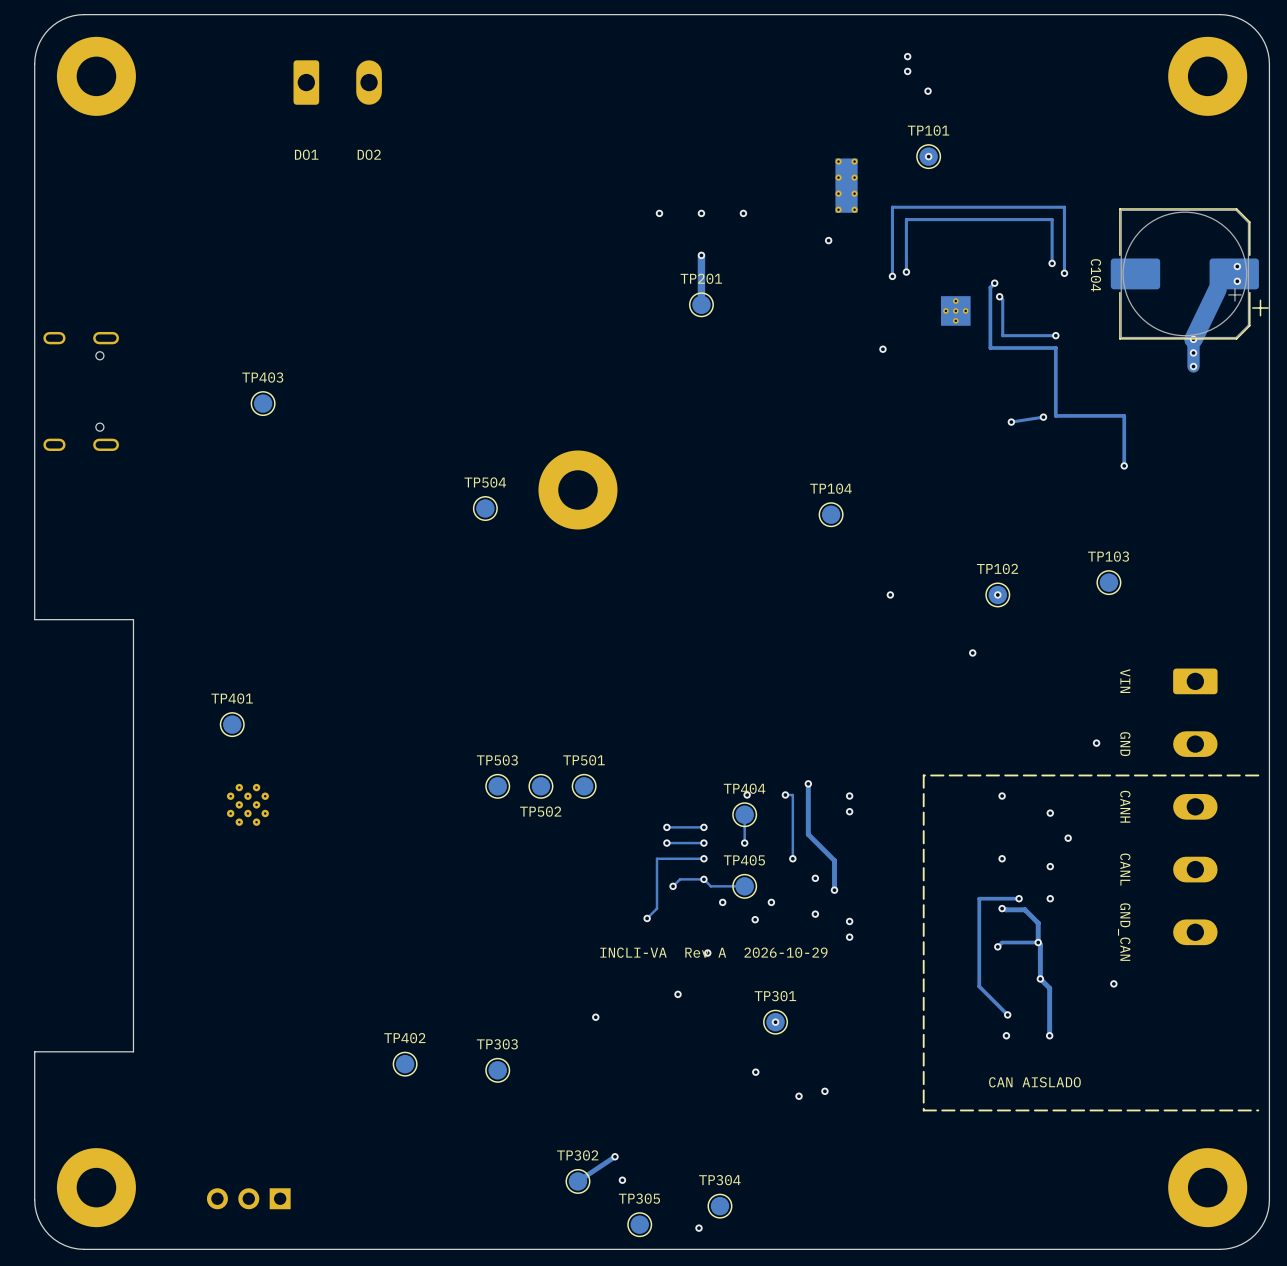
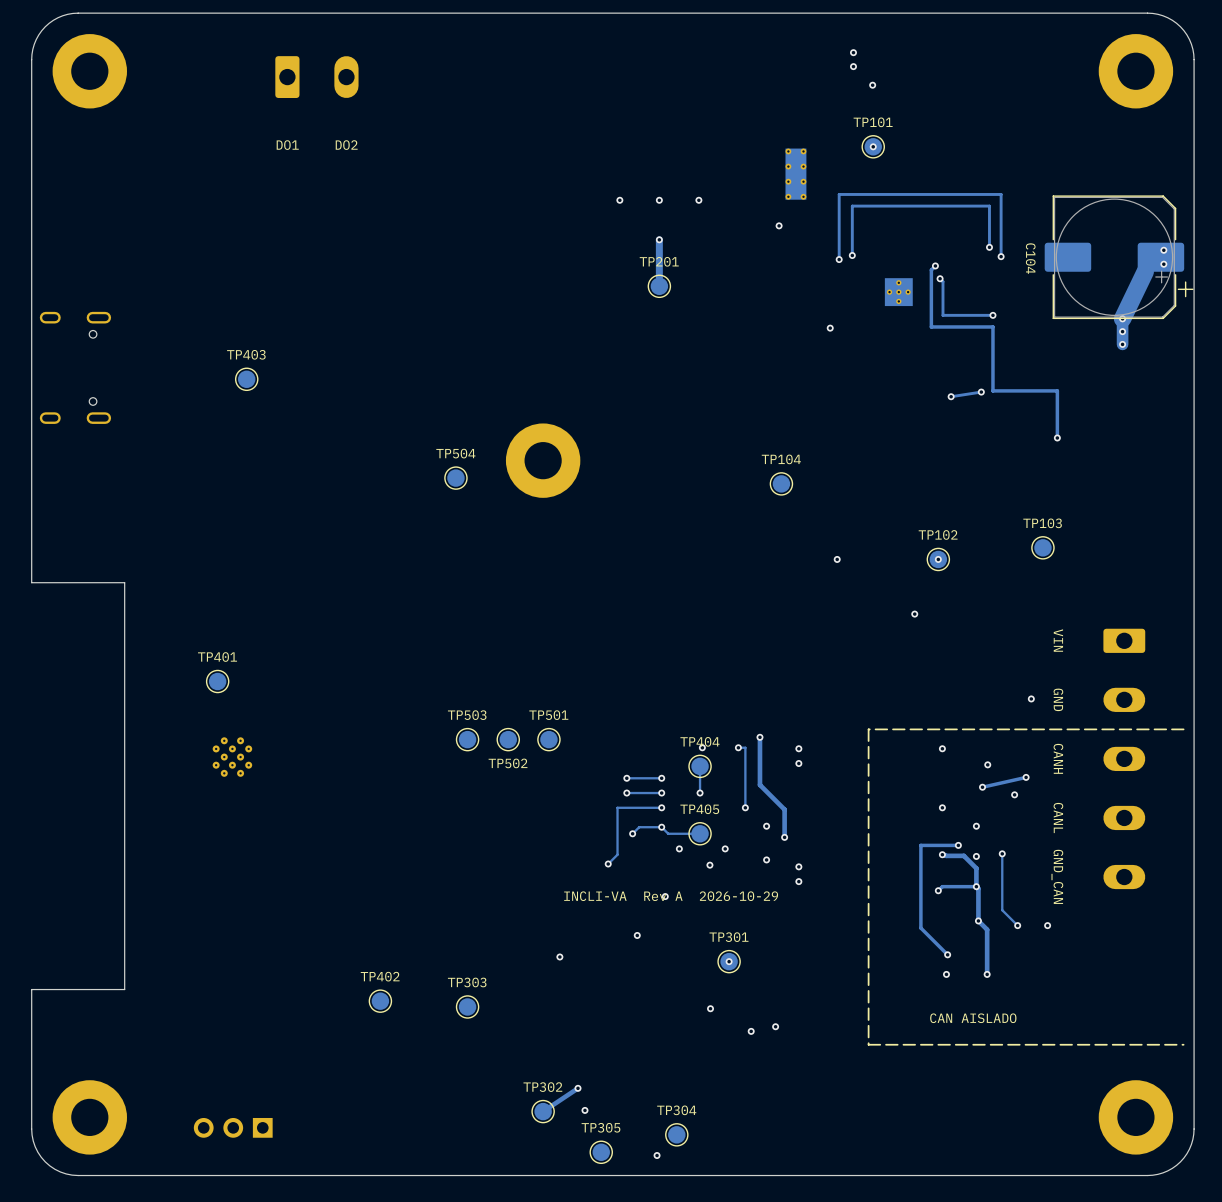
track: none -> (1026, 777) (982, 787)
via: none -> (1026, 777)
via: none -> (982, 787)
via: (1068, 838) -> none
via: none -> (1014, 794)
via: (1050, 866) -> none
via: none -> (976, 826)
via: (1050, 898) -> none
track: none -> (1002, 853) (1002, 910) (1017, 925)
via: none -> (1002, 853)
via: none -> (976, 856)
via: none -> (1017, 925)

